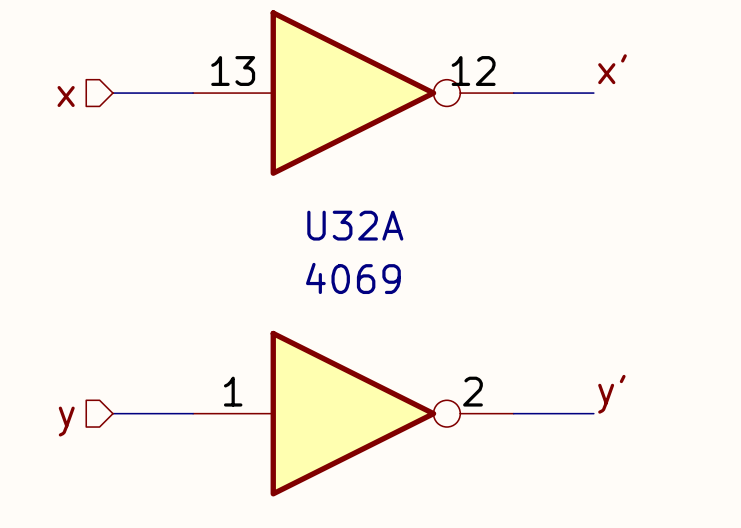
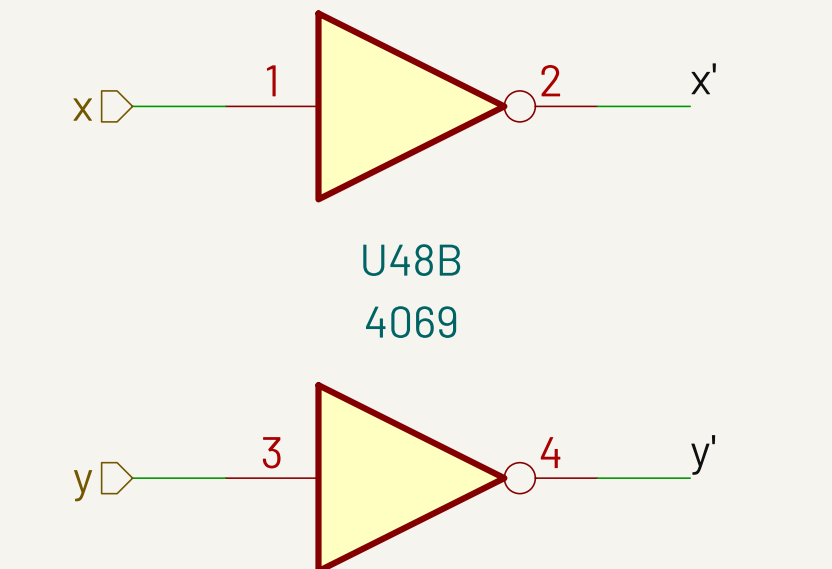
part pin number: 13 (233, 71) -> 1 (271, 80)
part pin number: 12 (473, 71) -> 2 (550, 80)
U32A name: U32A (355, 225) -> U48B (411, 260)
U32A pin number: 1 (233, 391) -> 3 (271, 452)
U32A pin number: 2 (473, 391) -> 4 (550, 452)

